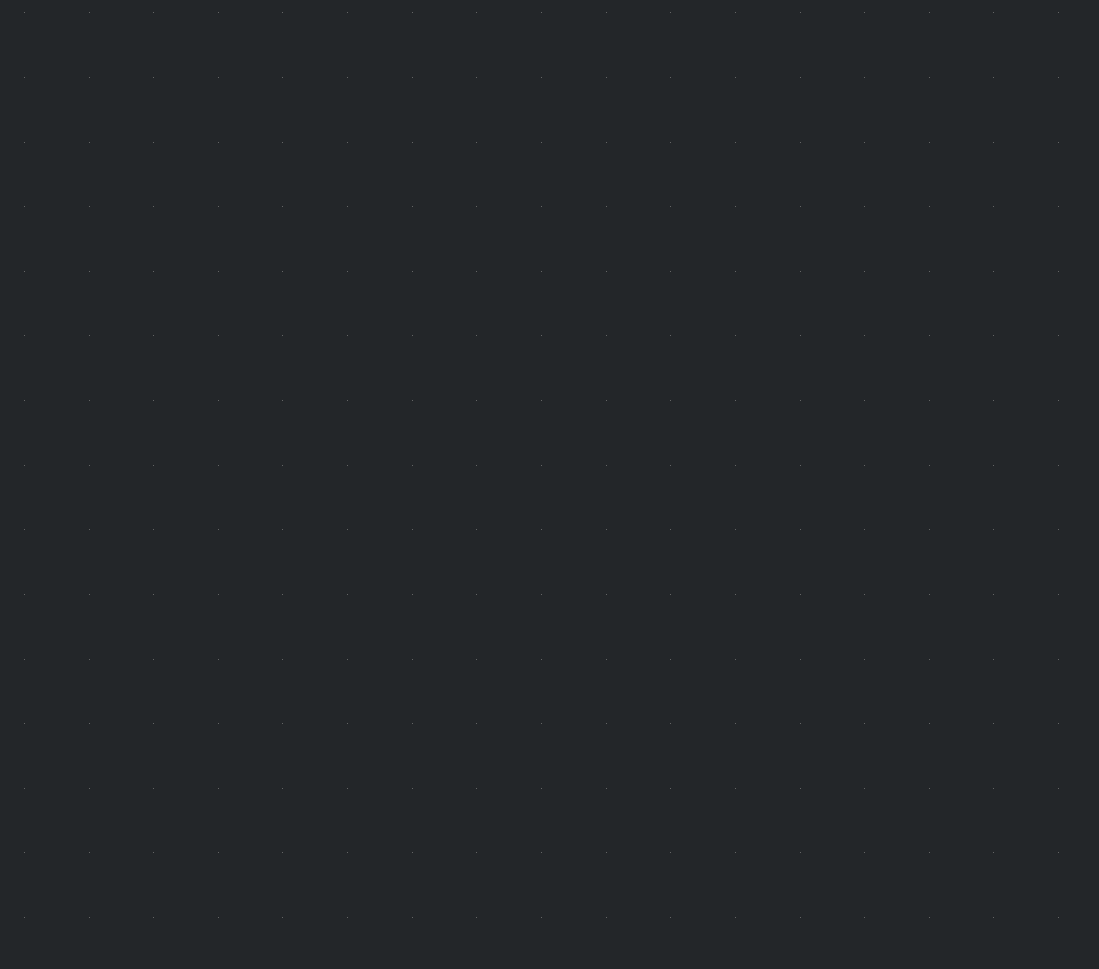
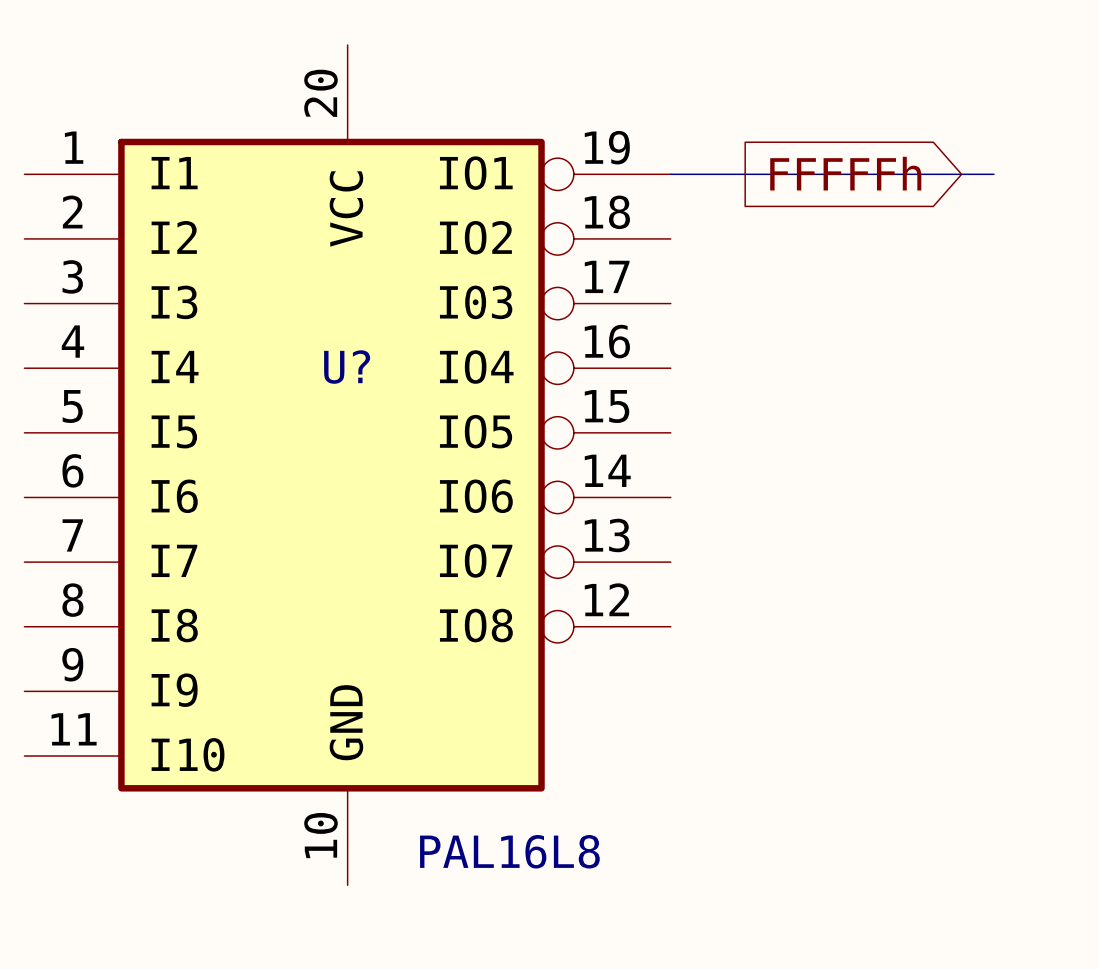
global label: none -> FFFFFh (845, 173)
wire: none -> (670, 174) (993, 174)
U?: none -> PAL16L8 (347, 465)

